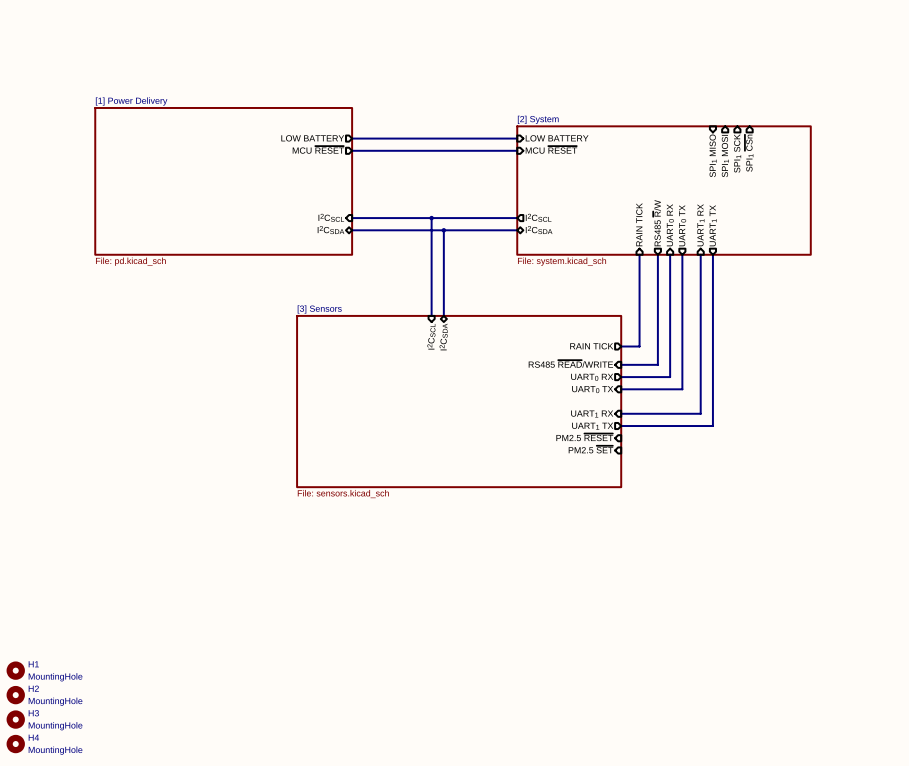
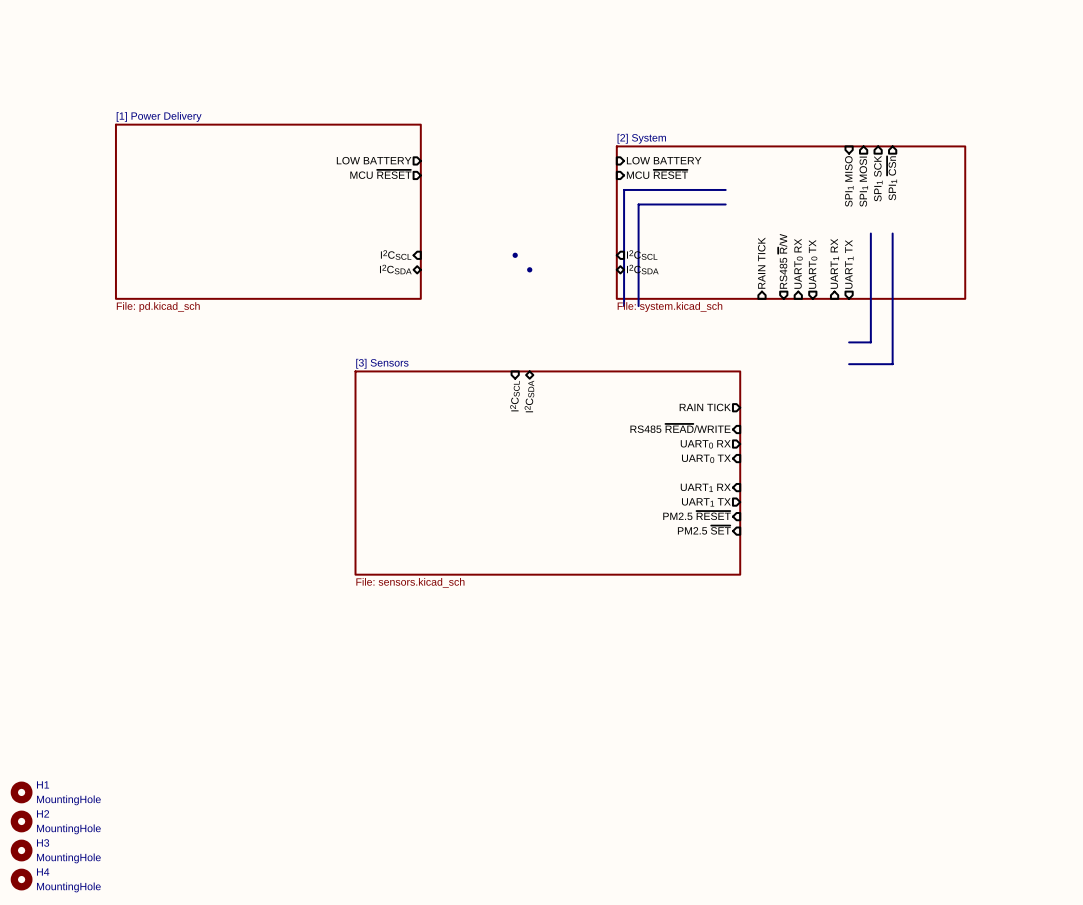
wire: (352, 138) (517, 138) -> none
wire: (352, 150) (517, 150) -> none
wire: none -> (725, 189) (624, 189) (624, 306)
wire: none -> (725, 204) (638, 204) (638, 306)
wire: (352, 218) (517, 218) -> none
wire: (431, 218) (431, 315) -> none
wire: (352, 230) (517, 230) -> none
wire: (443, 230) (443, 315) -> none
wire: (639, 254) (639, 346) (621, 346) -> (870, 233) (870, 342) (849, 342)
wire: (657, 254) (657, 364) (621, 364) -> (892, 233) (892, 364) (849, 364)
wire: (670, 254) (670, 377) (621, 377) -> none
wire: (682, 254) (682, 389) (621, 389) -> none
wire: (700, 254) (700, 413) (621, 413) -> none
wire: (712, 254) (712, 426) (621, 426) -> none

